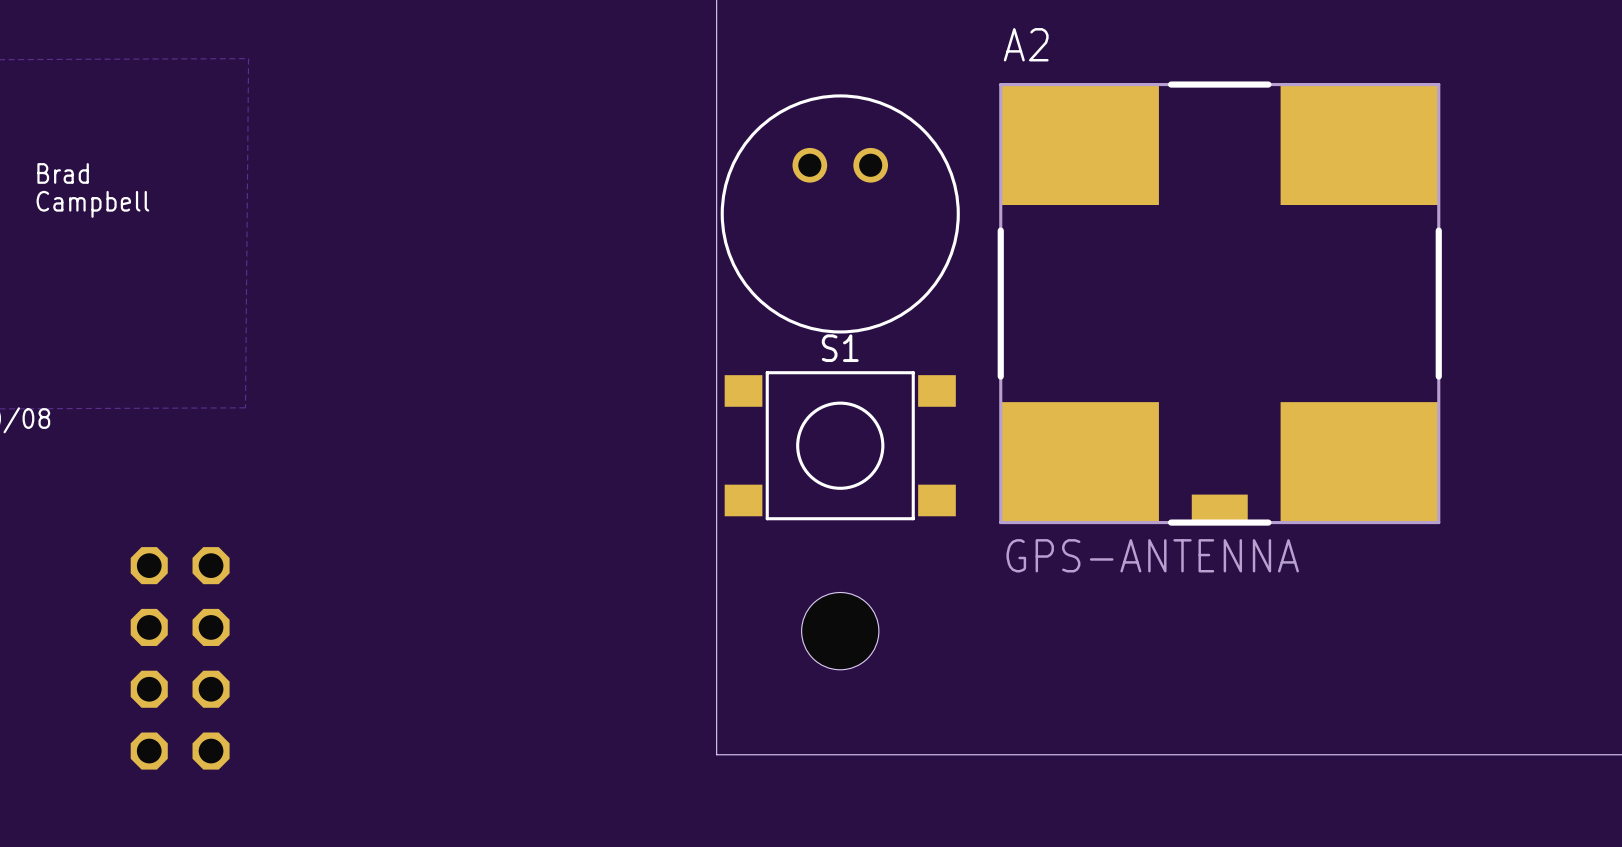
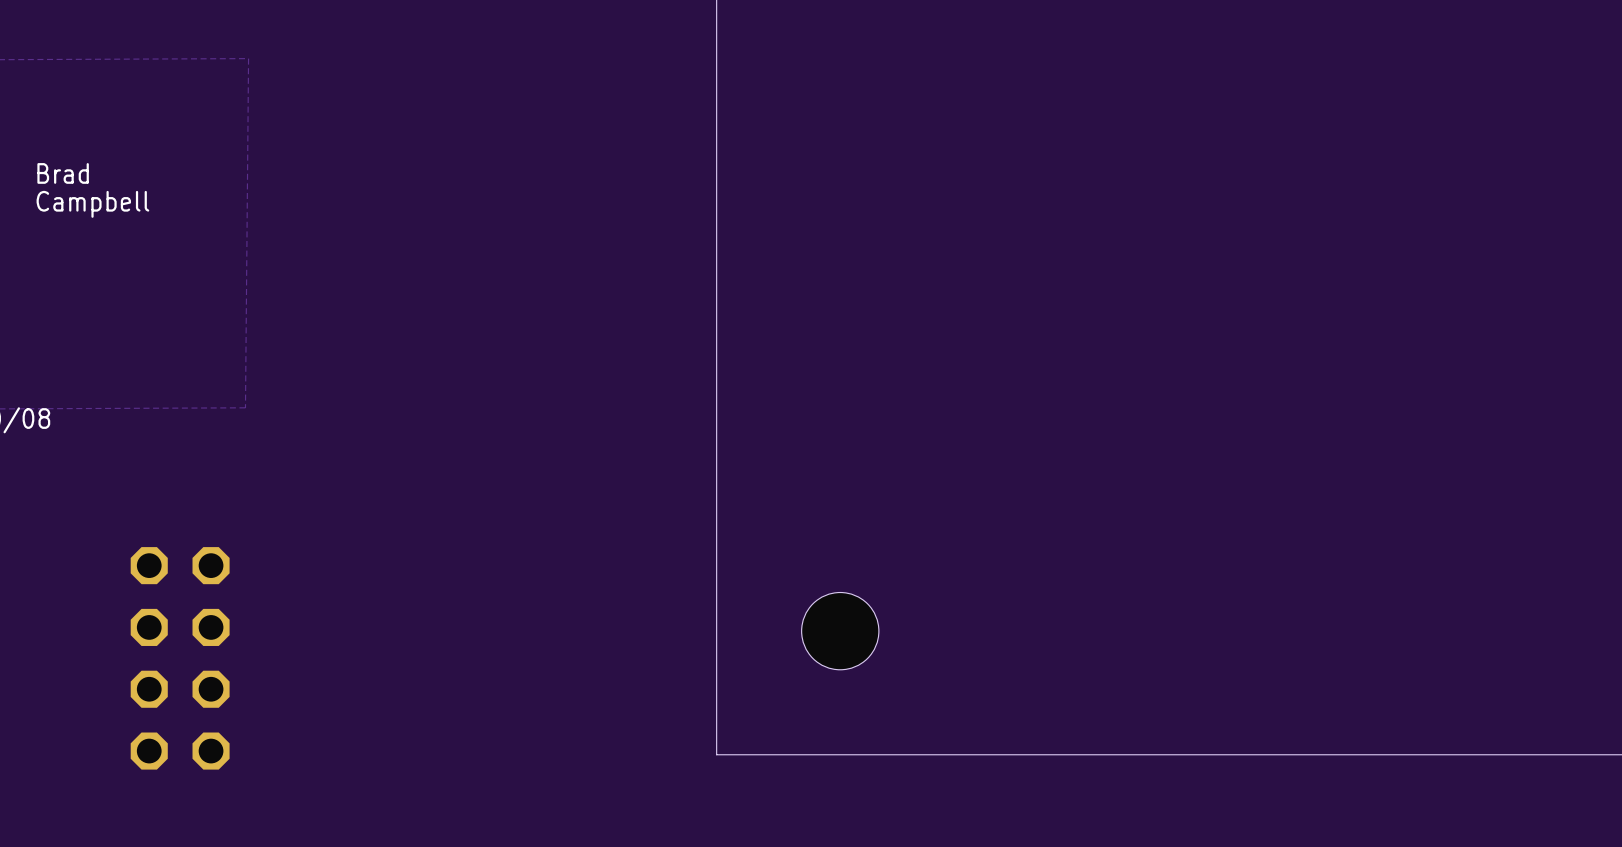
part: (840, 213) -> none
A2: GPS-ANTENNA (1219, 303) -> none
S1: (840, 445) -> none

